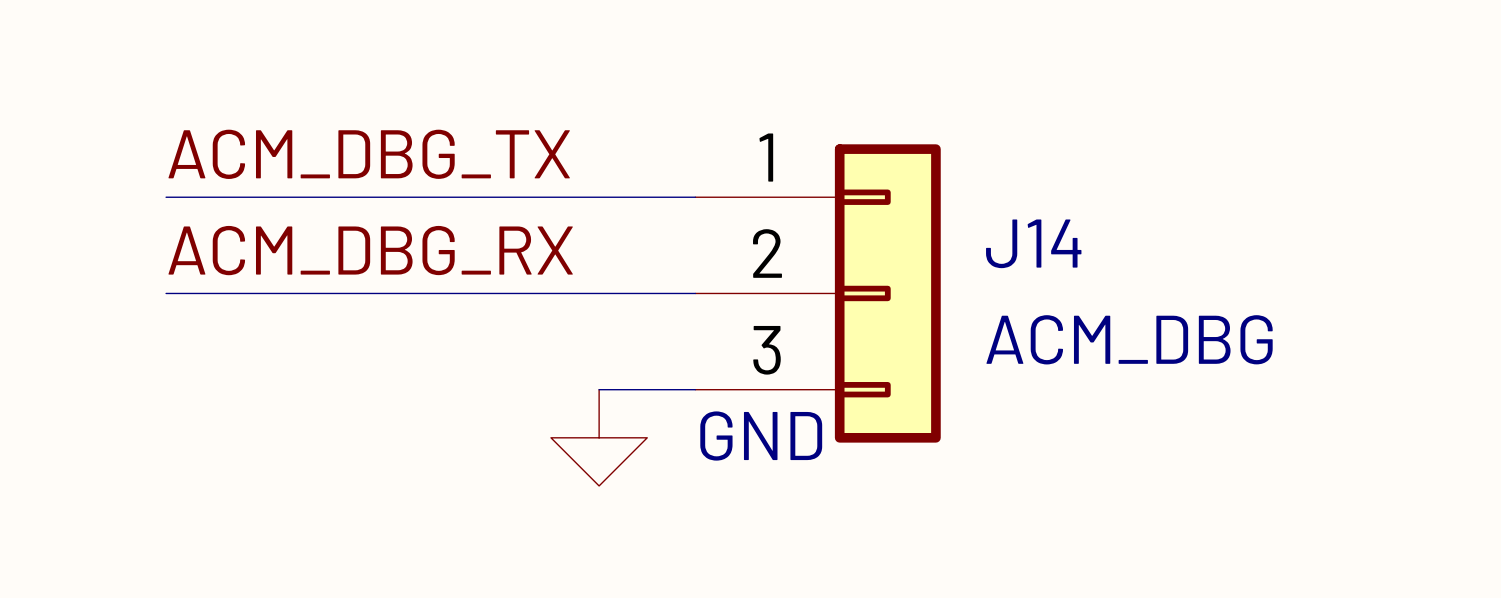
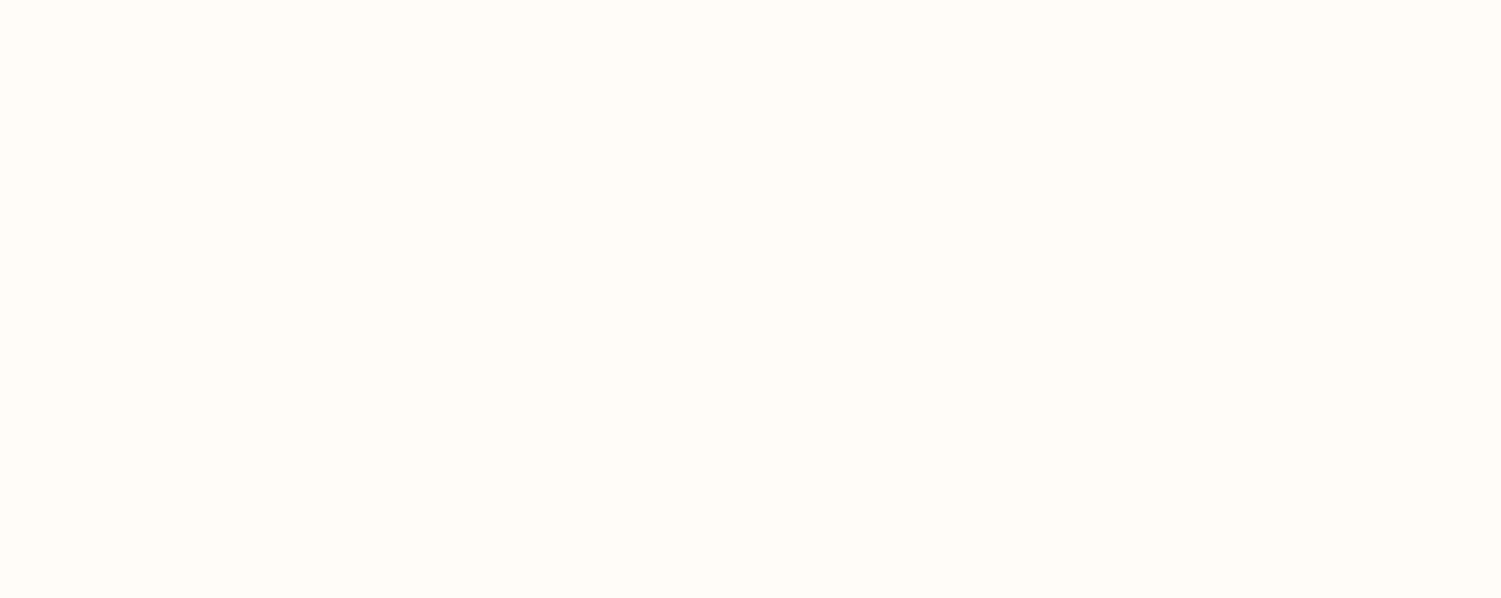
label: ACM_DBG_TX (369, 154) -> none
wire: (166, 197) (695, 197) -> none
label: ACM_DBG_RX (370, 250) -> none
wire: (166, 293) (695, 293) -> none
J14: ACM_DBG (818, 293) -> none
wire: (599, 389) (695, 389) -> none
power symbol: GND (599, 437) -> none

